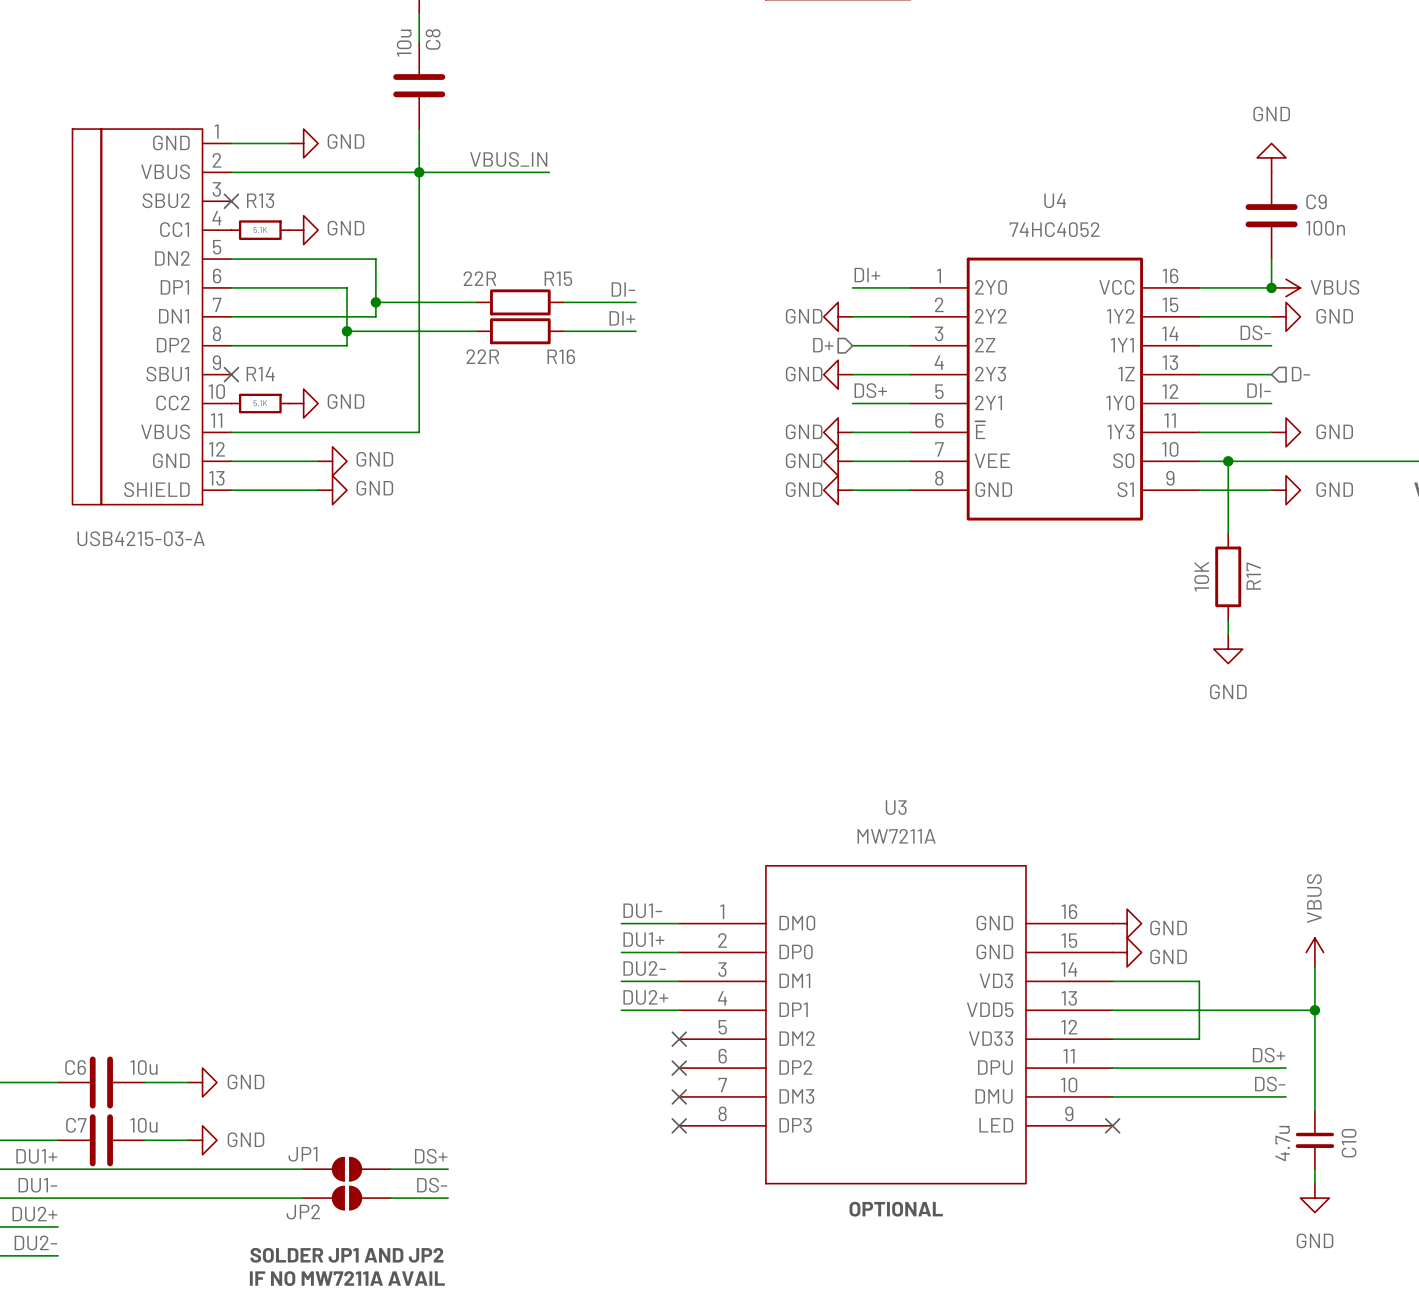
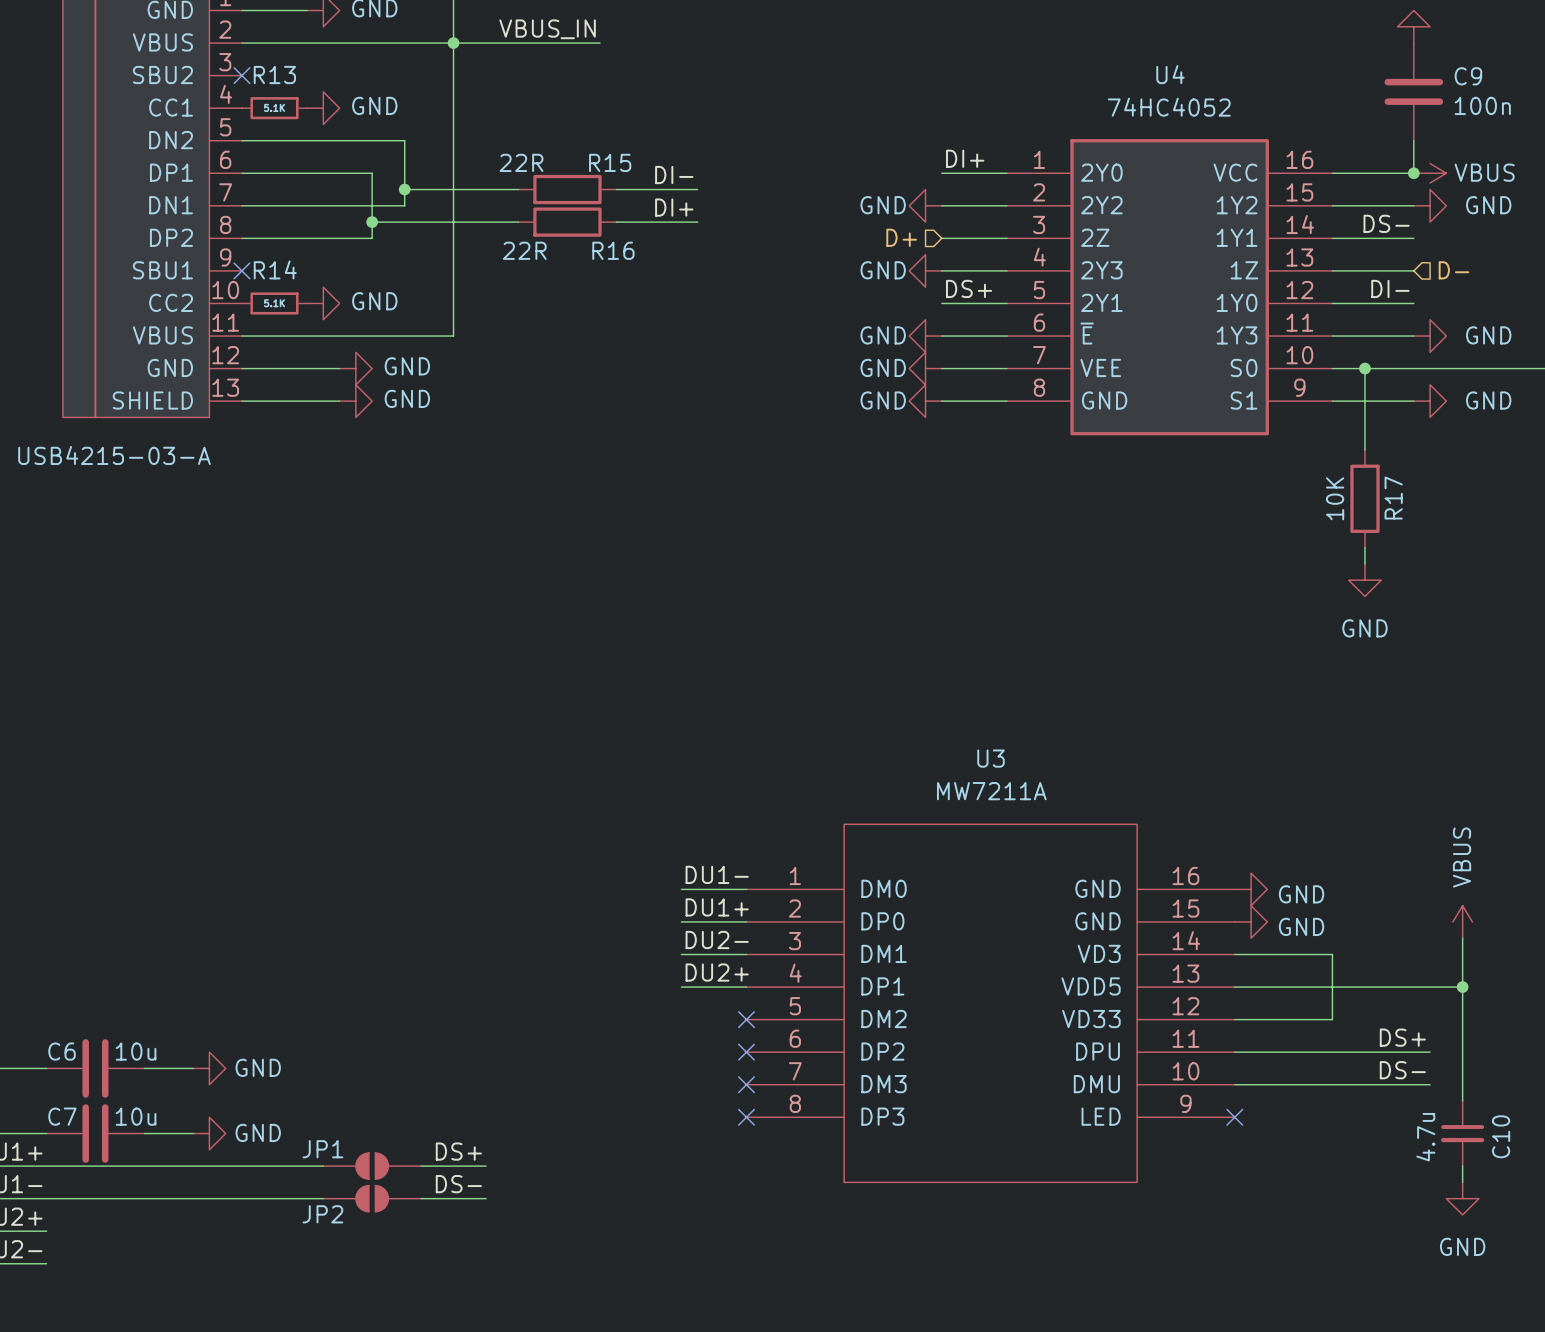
text: OPTIONAL (896, 1209) -> none
text: SOLDER JP1 AND JP2 (346, 1255) -> none
text: IF NO MW7211A AVAIL (347, 1278) -> none

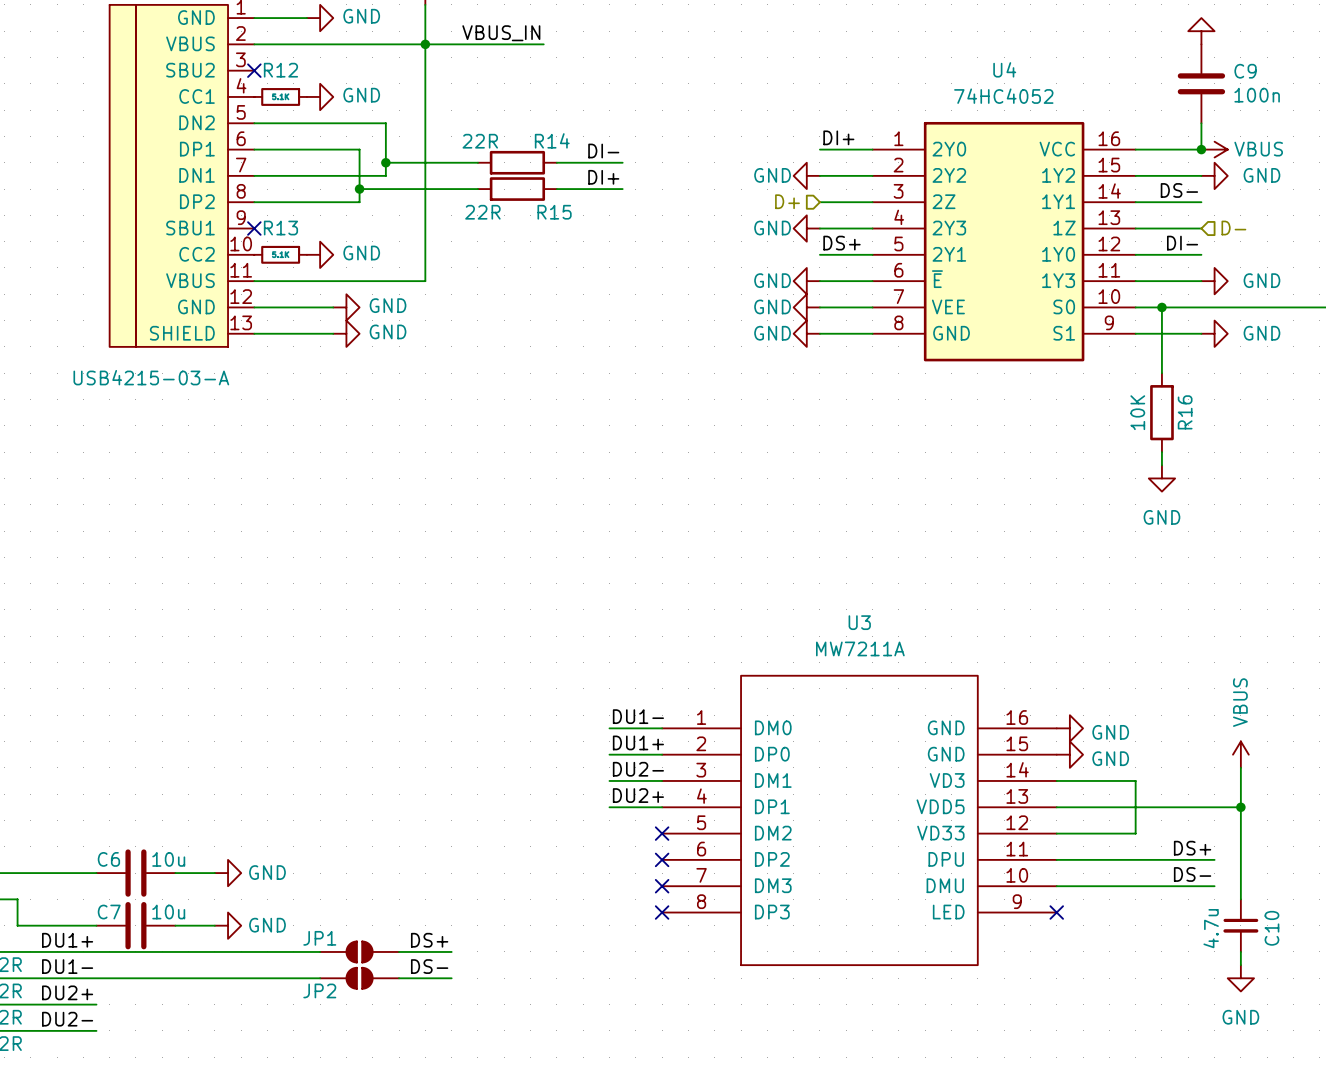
R13 name: R13 (274, 75) -> R12 (280, 70)
R15 name: R15 (610, 162) -> R14 (552, 140)
R16 name: R16 (613, 250) -> R15 (554, 212)
R14 name: R14 (275, 269) -> R13 (280, 228)
R17 name: R17 (1393, 498) -> R16 (1185, 412)

